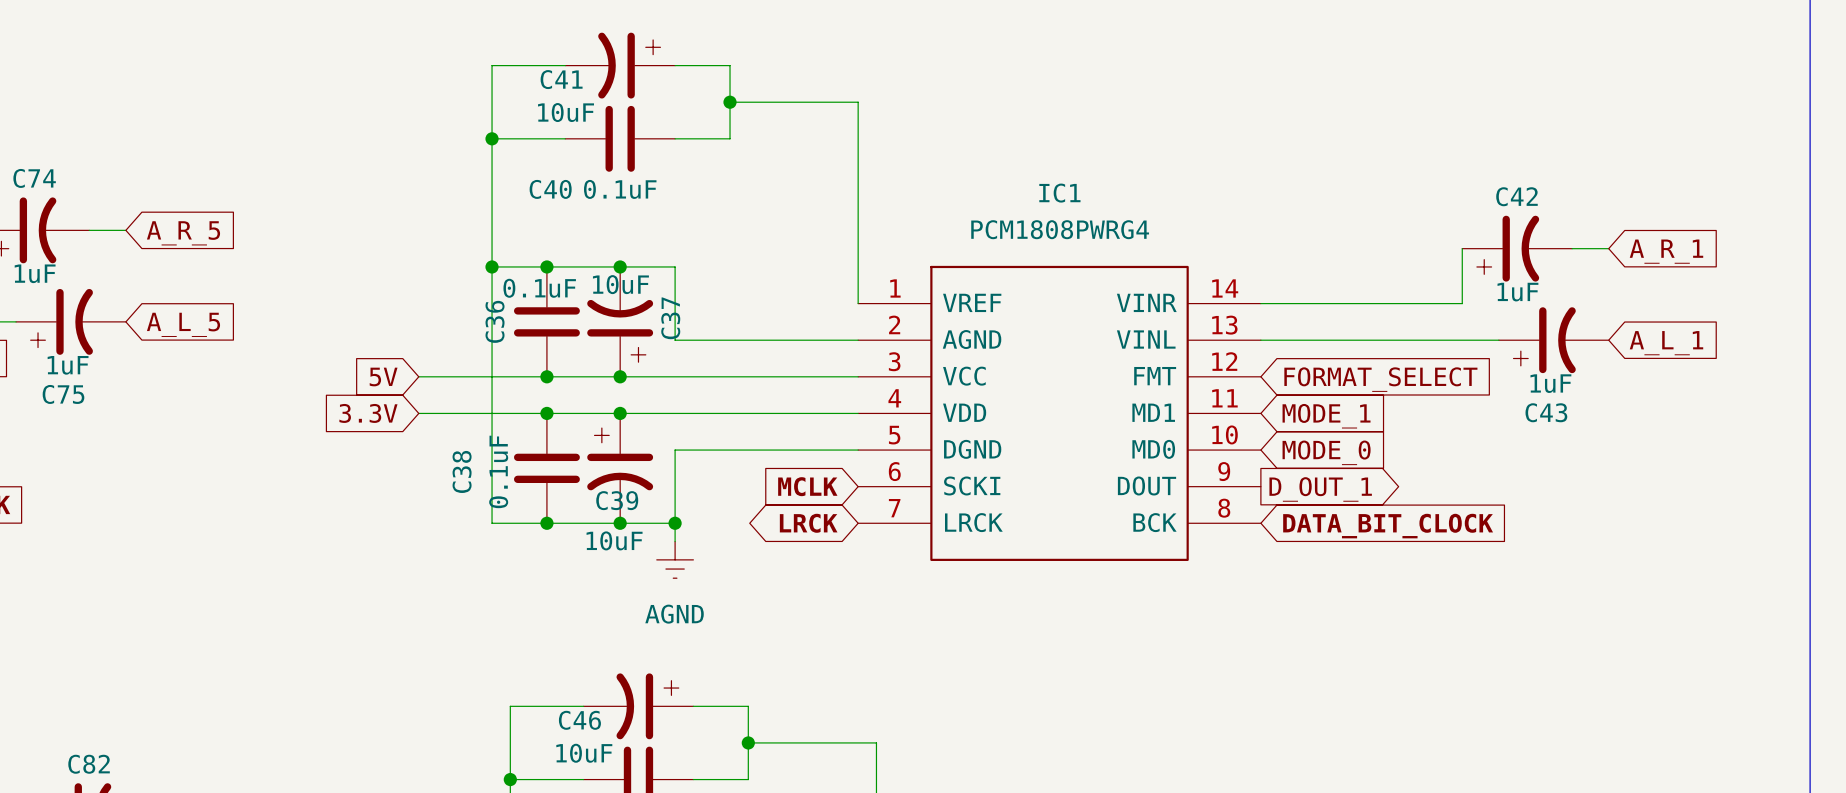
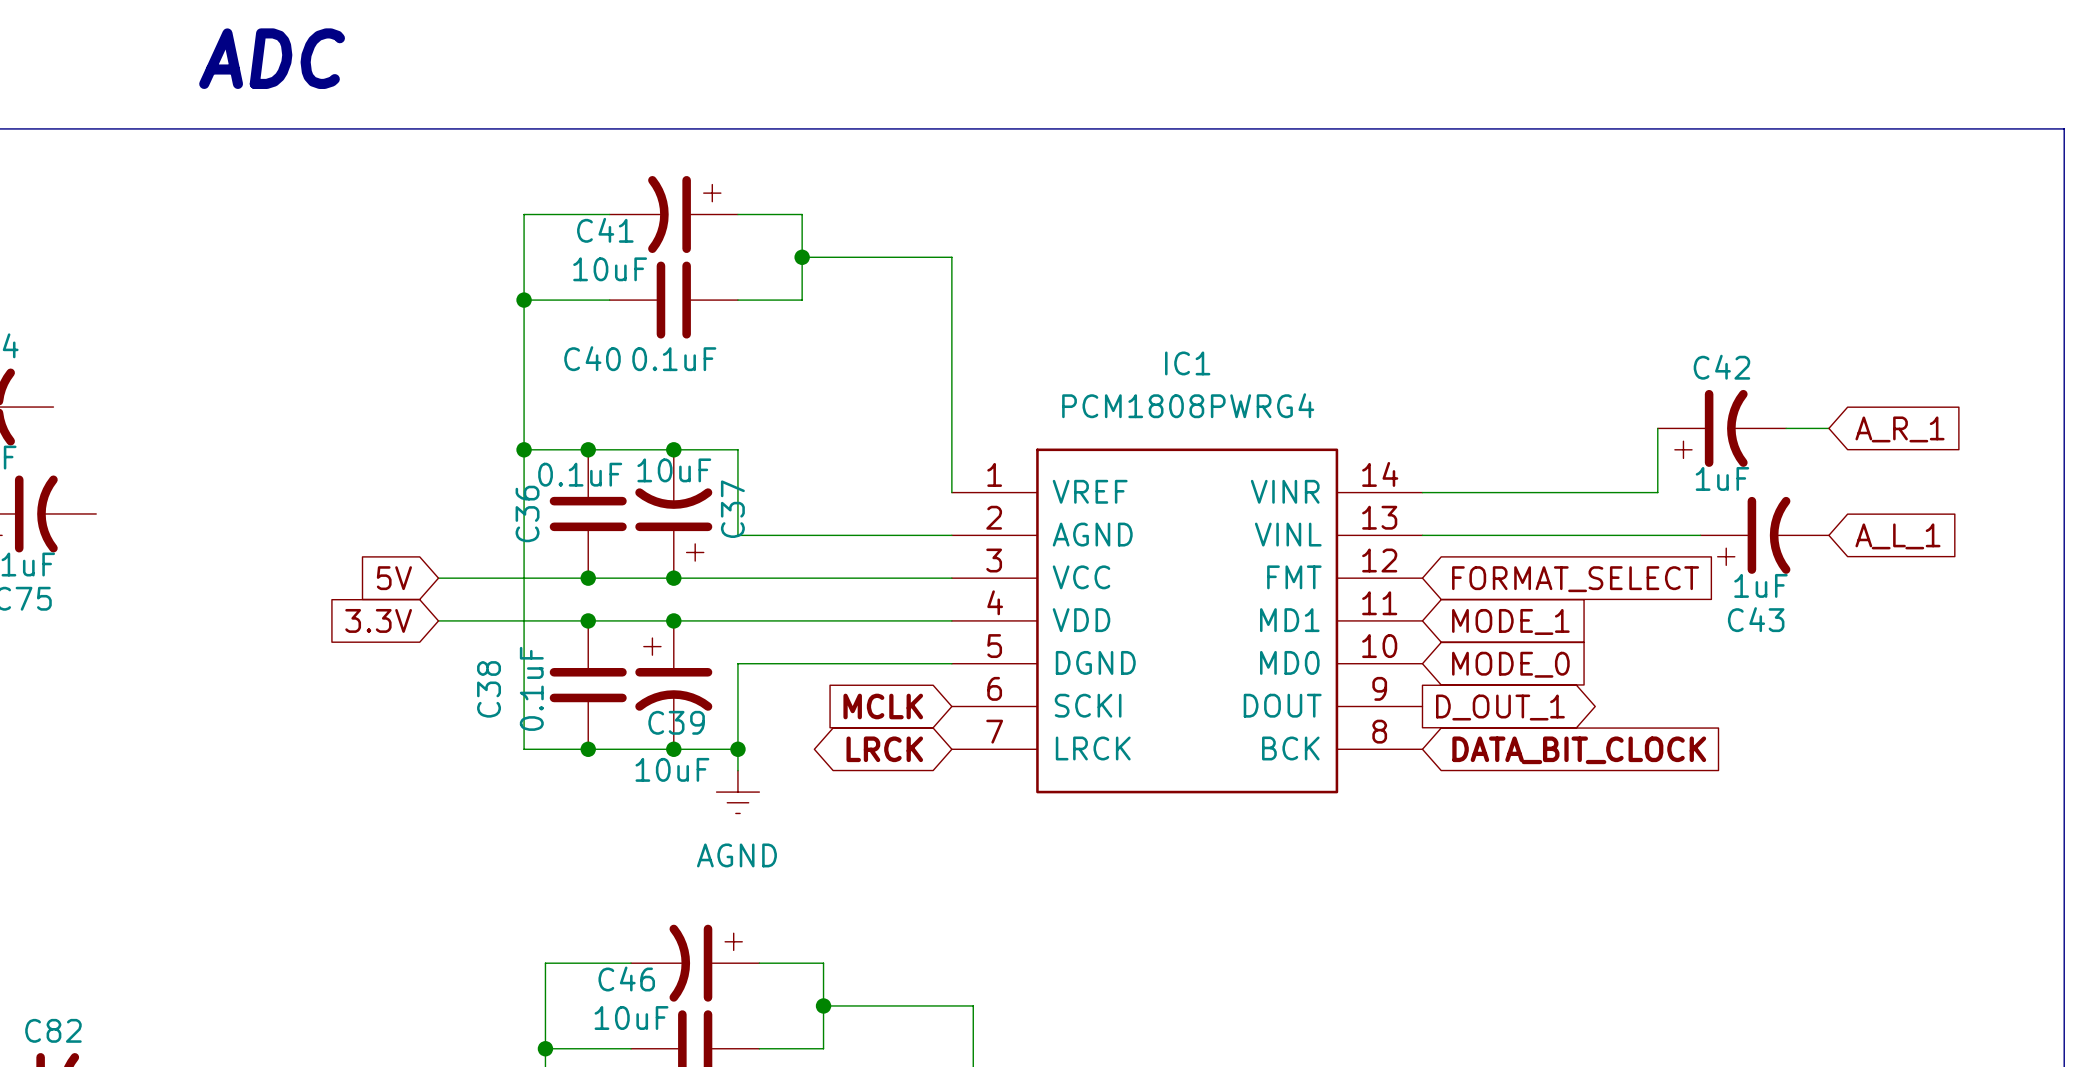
wire: (89, 230) (125, 230) -> none
global label: A_R_5 (183, 233) -> none
global label: A_L_5 (183, 324) -> none

